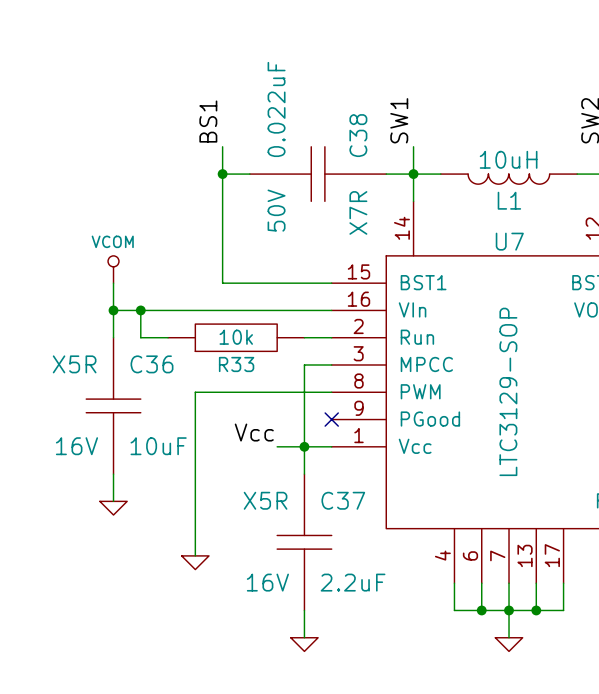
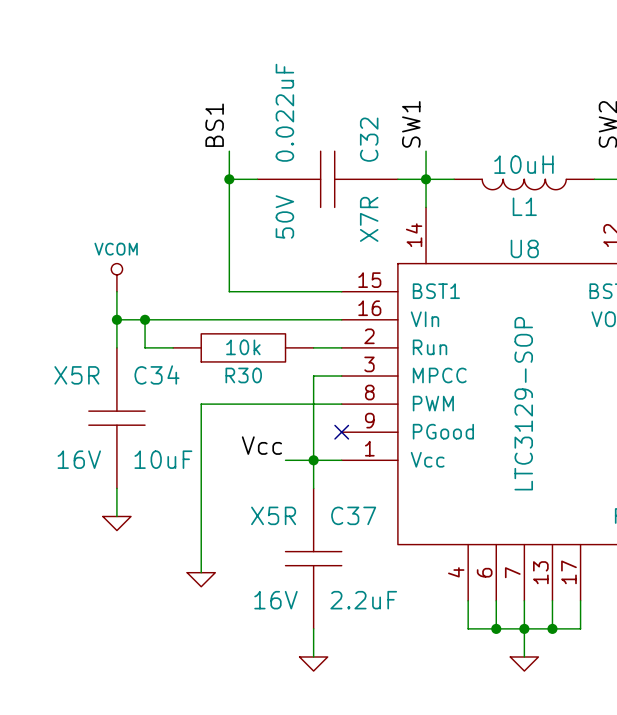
C38 name: C38 (358, 135) -> C32 (369, 139)
U7 name: U7 (509, 241) -> U8 (524, 248)
C36 name: C36 (151, 364) -> C34 (156, 374)
R33 name: R33 (236, 364) -> R30 (243, 375)

